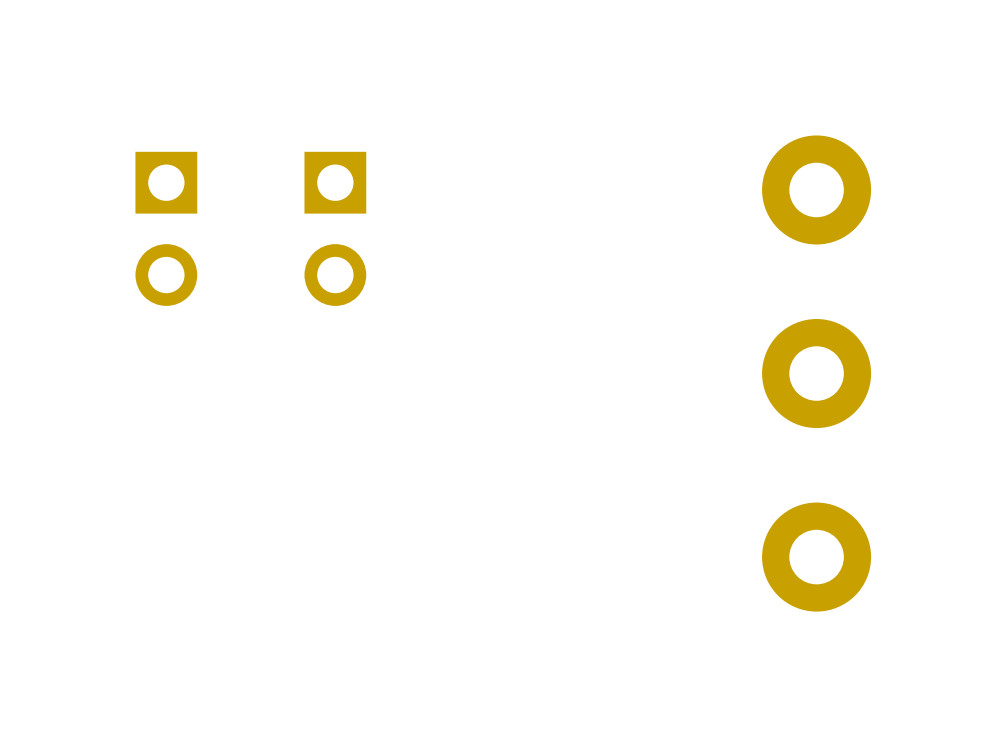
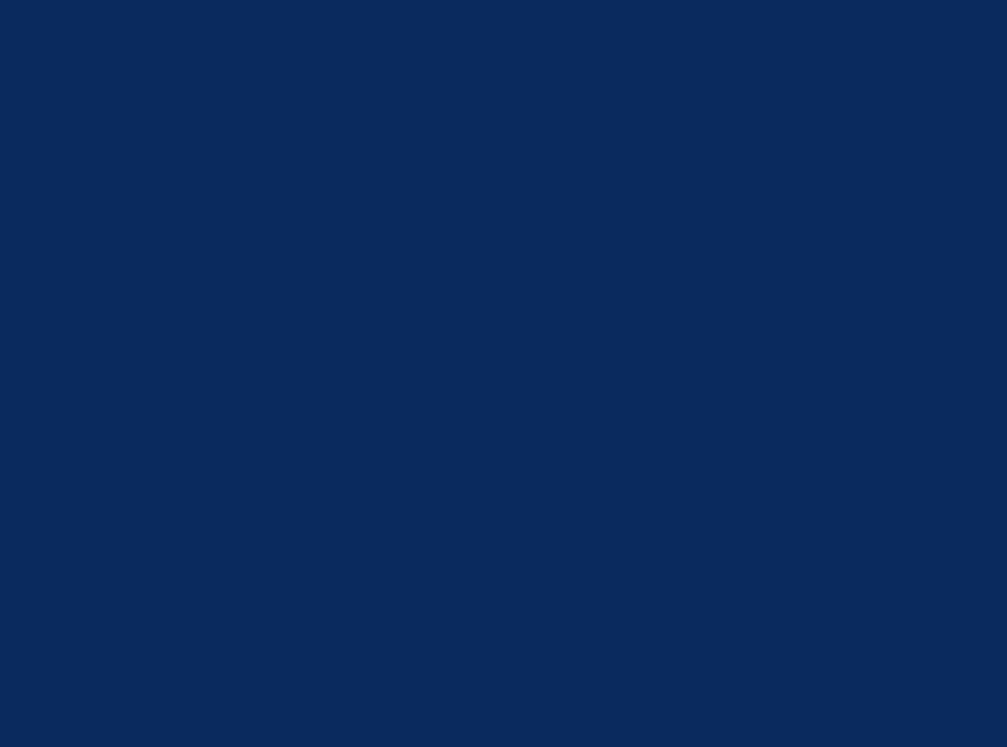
part: (816, 189) -> none
part: (166, 228) -> none
part: (335, 228) -> none
part: (816, 373) -> none
part: (816, 557) -> none

